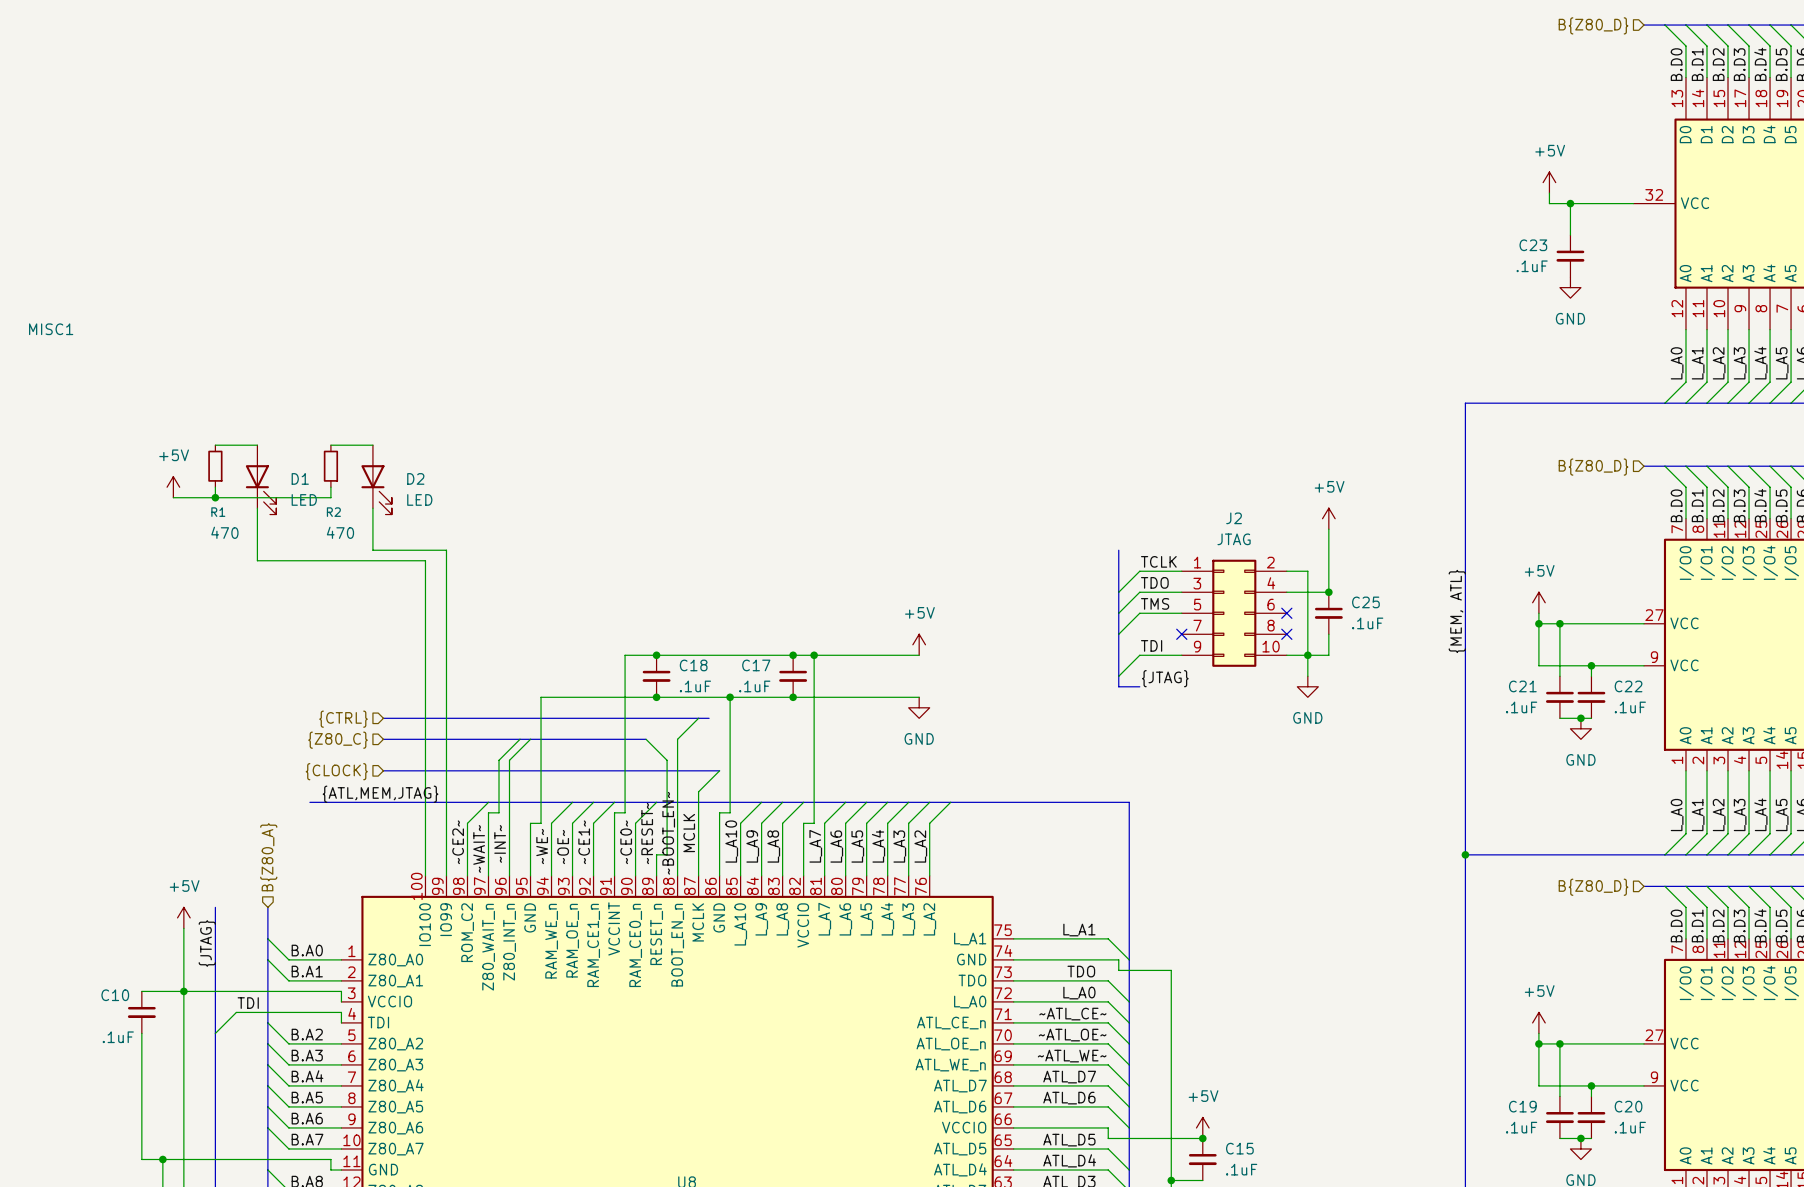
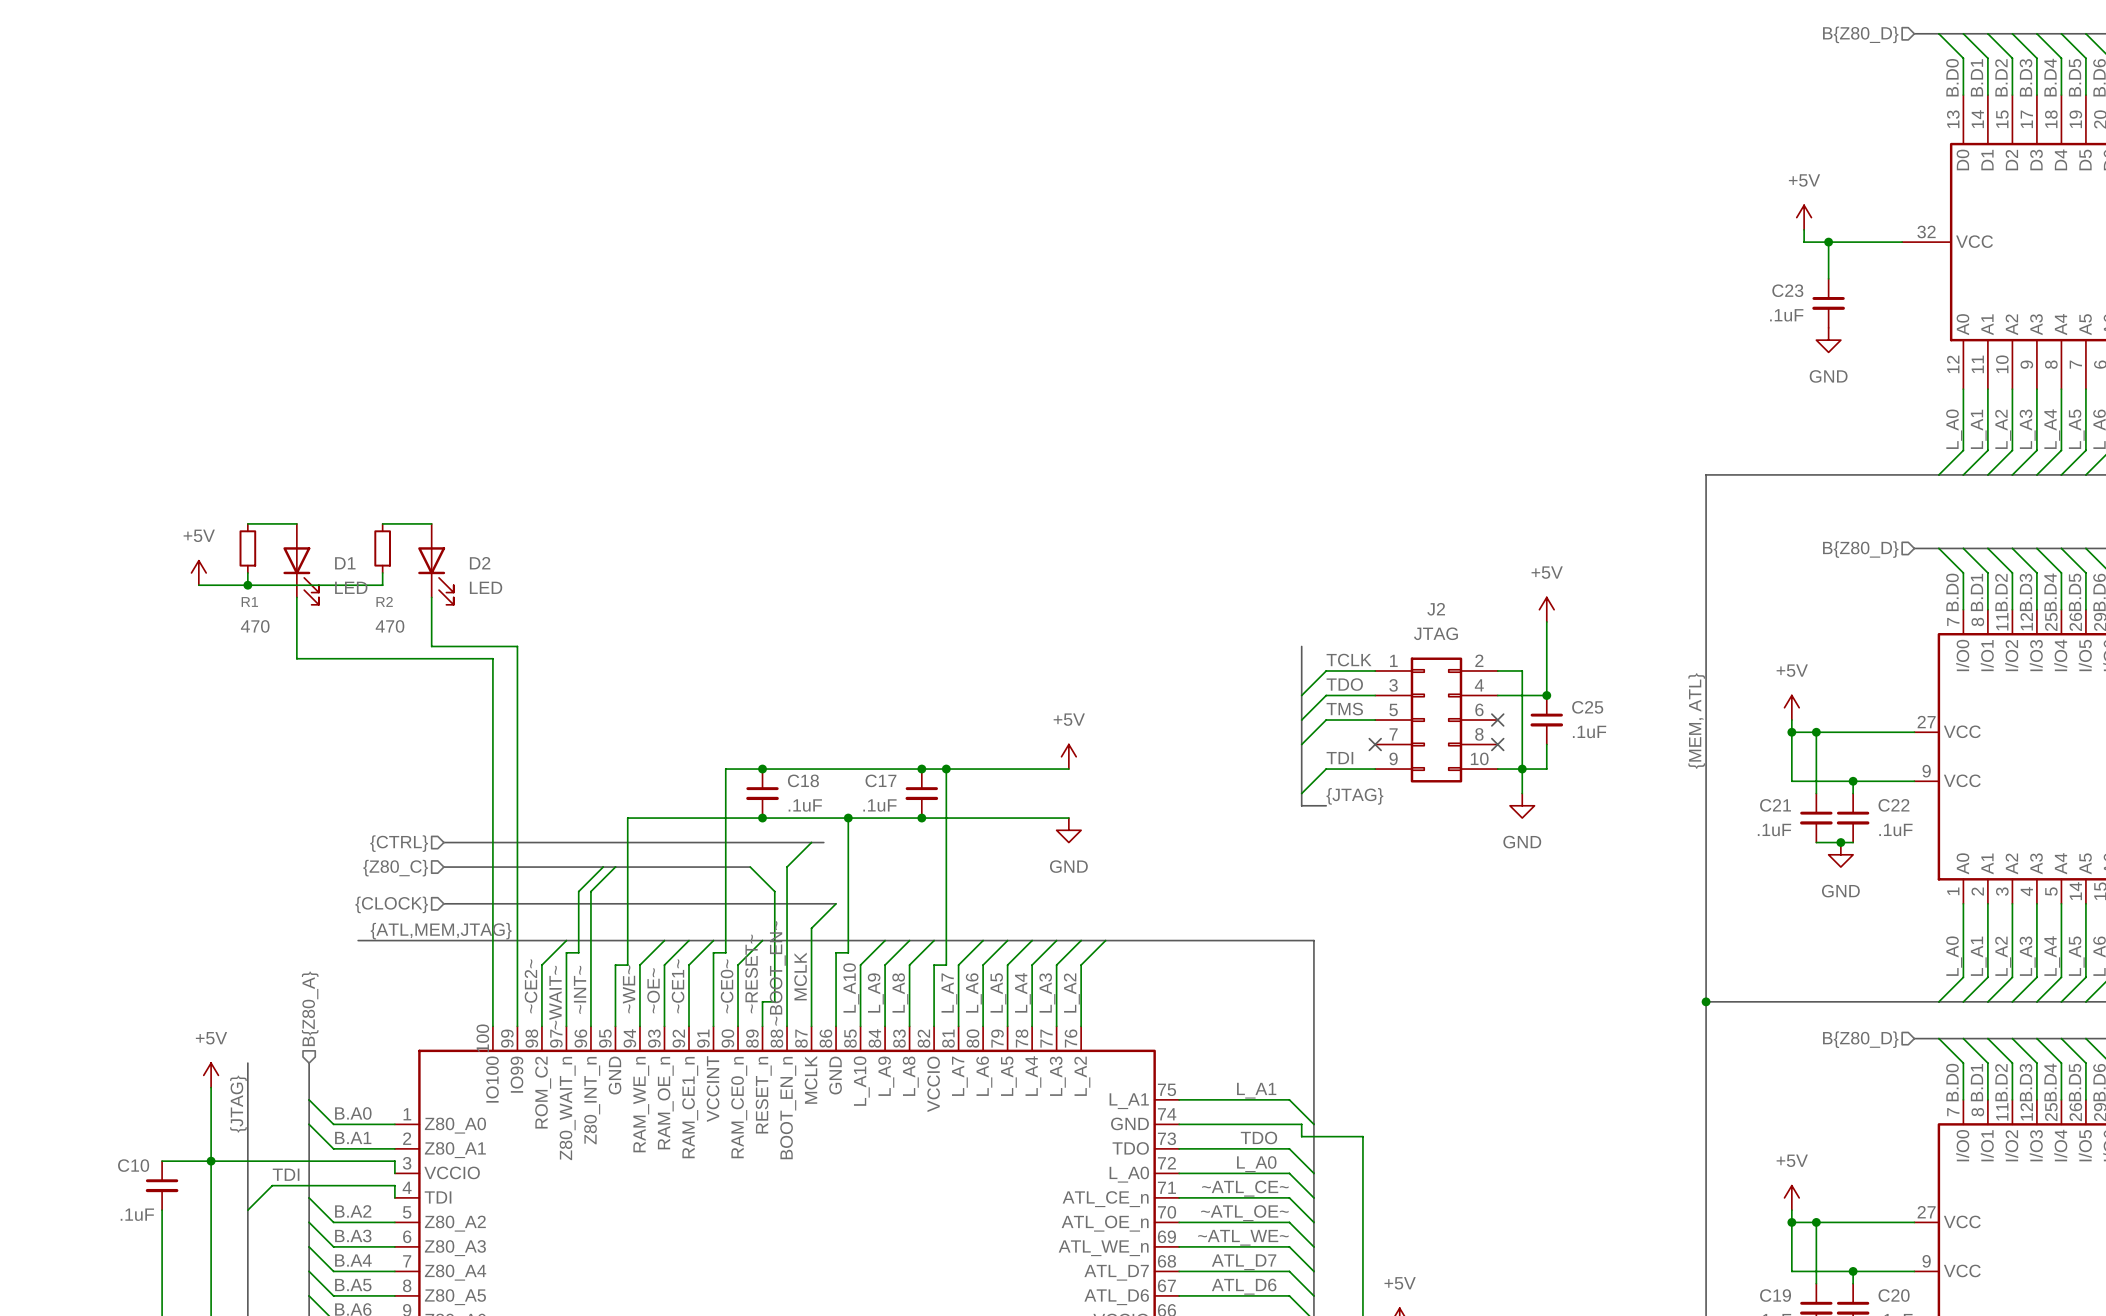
MISC1: (51, 329) -> none

